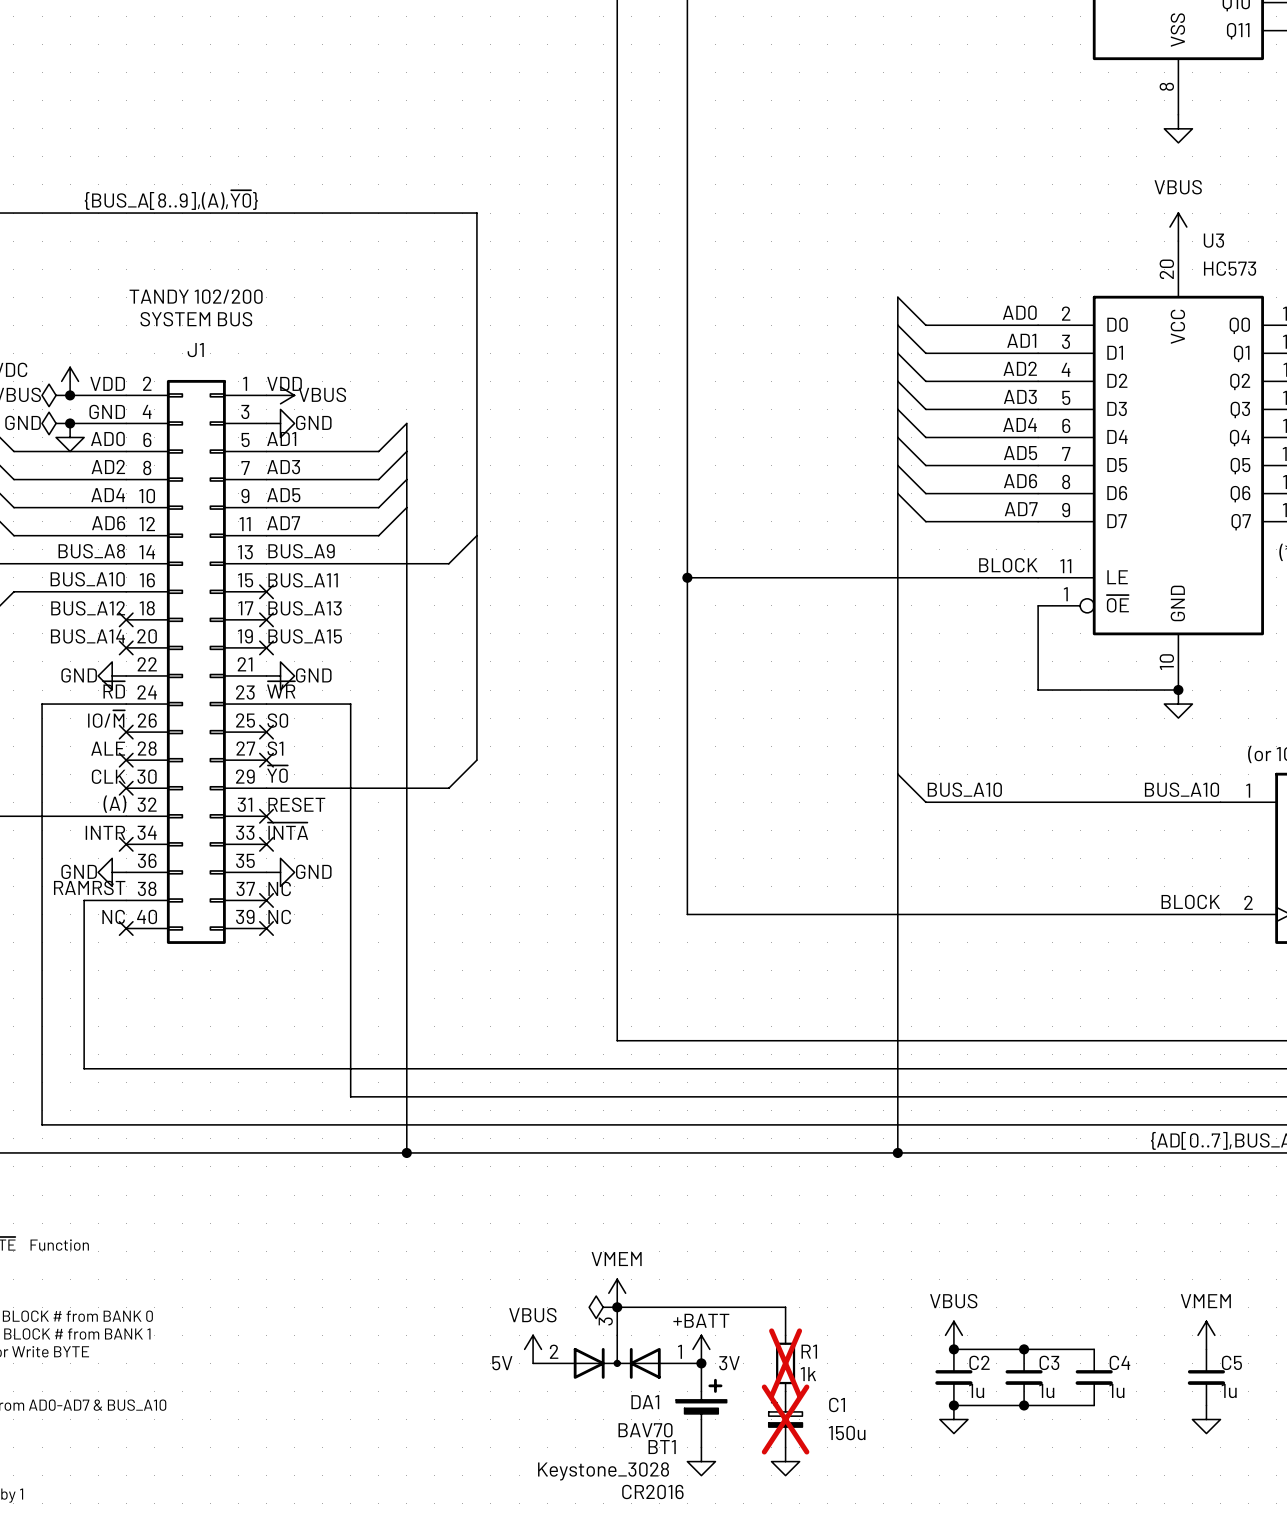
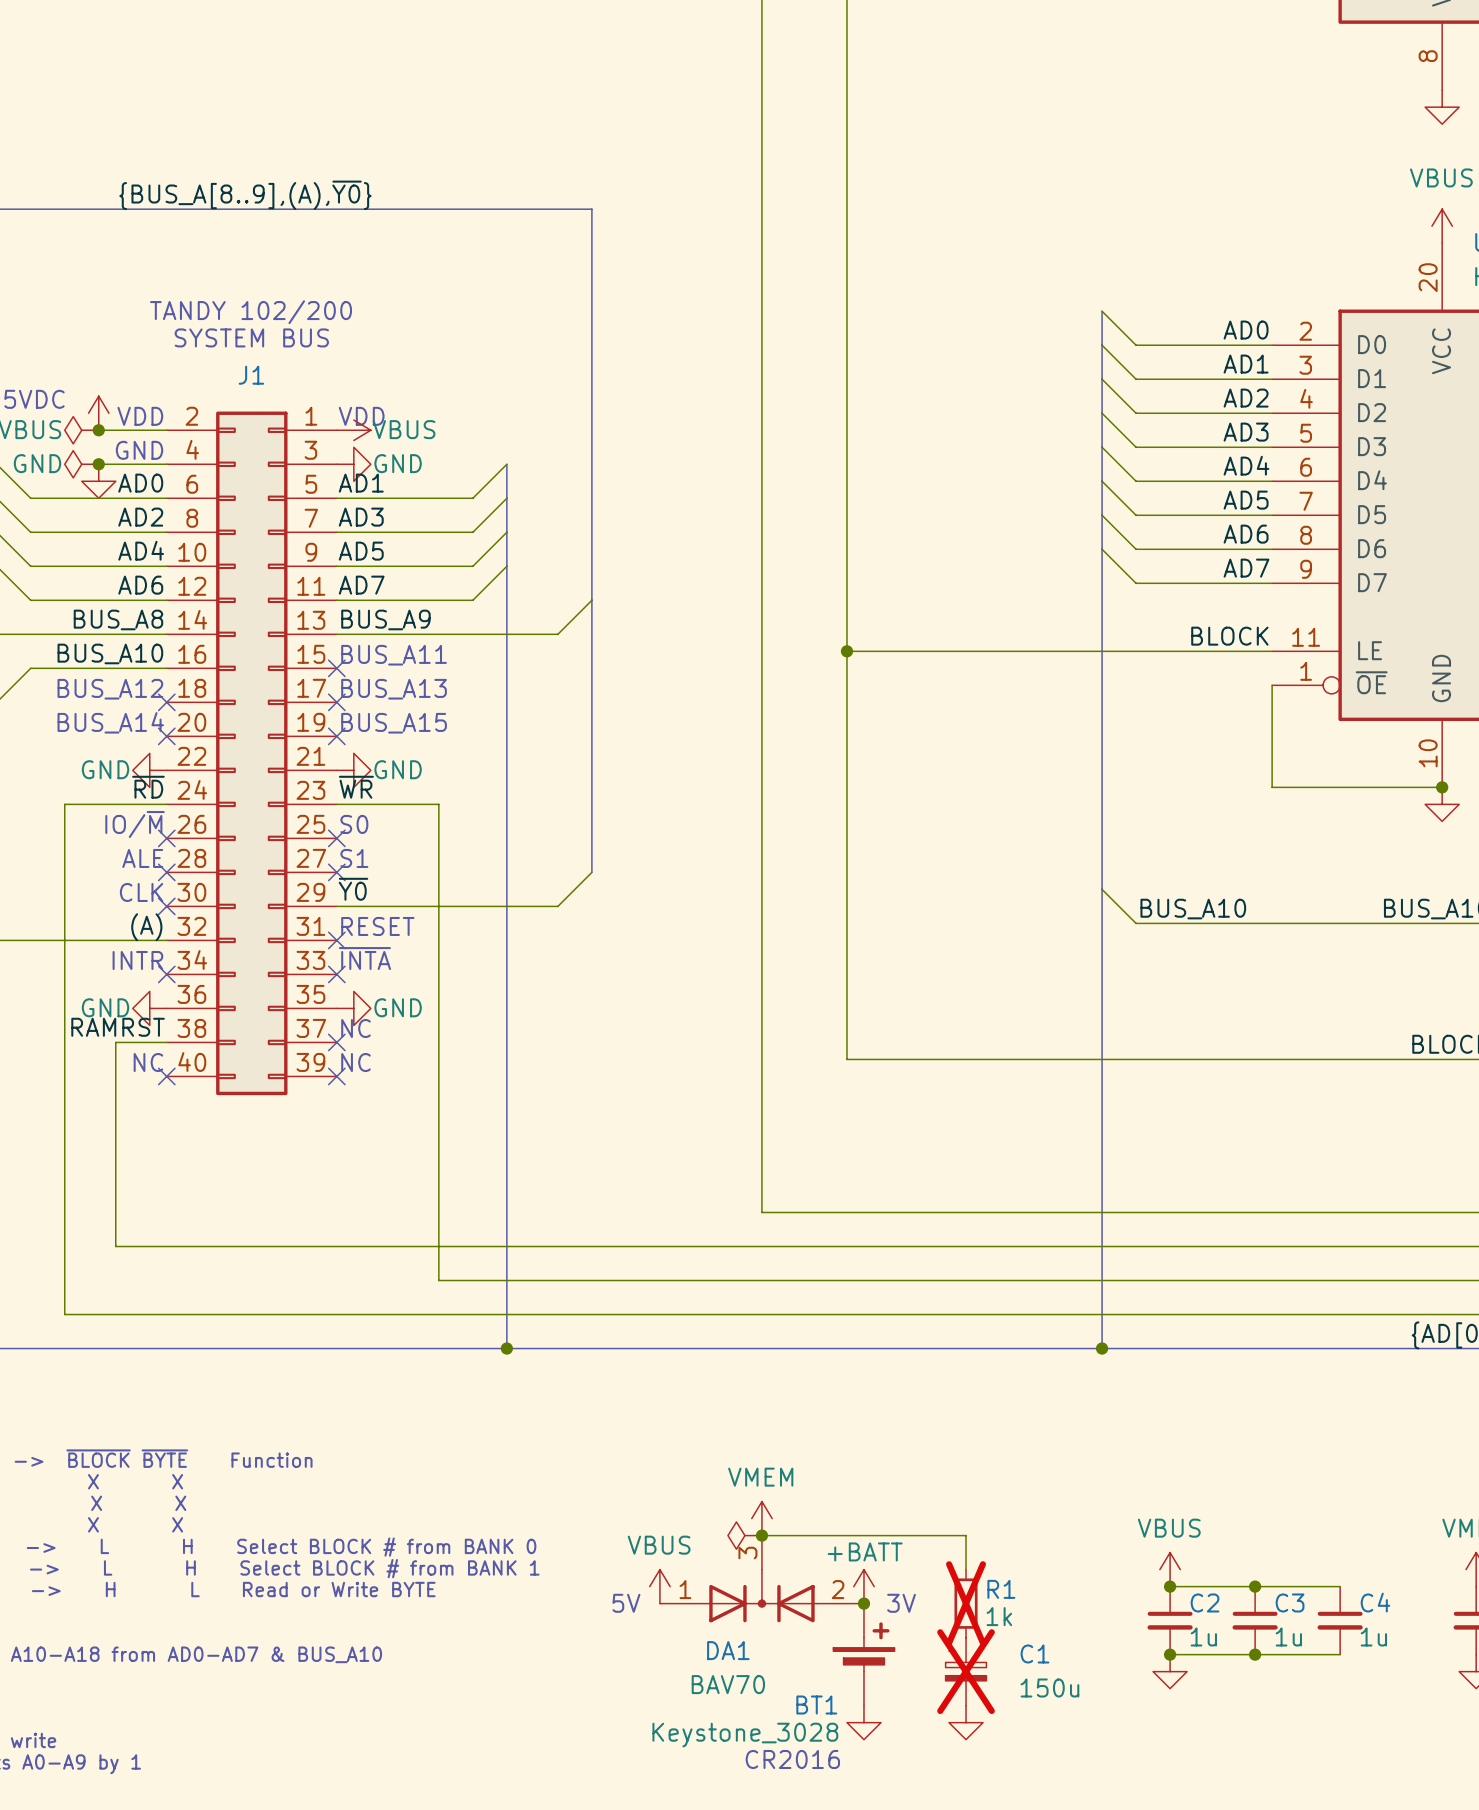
DA1 flip: as is (617, 1357) -> left-right (761, 1595)

